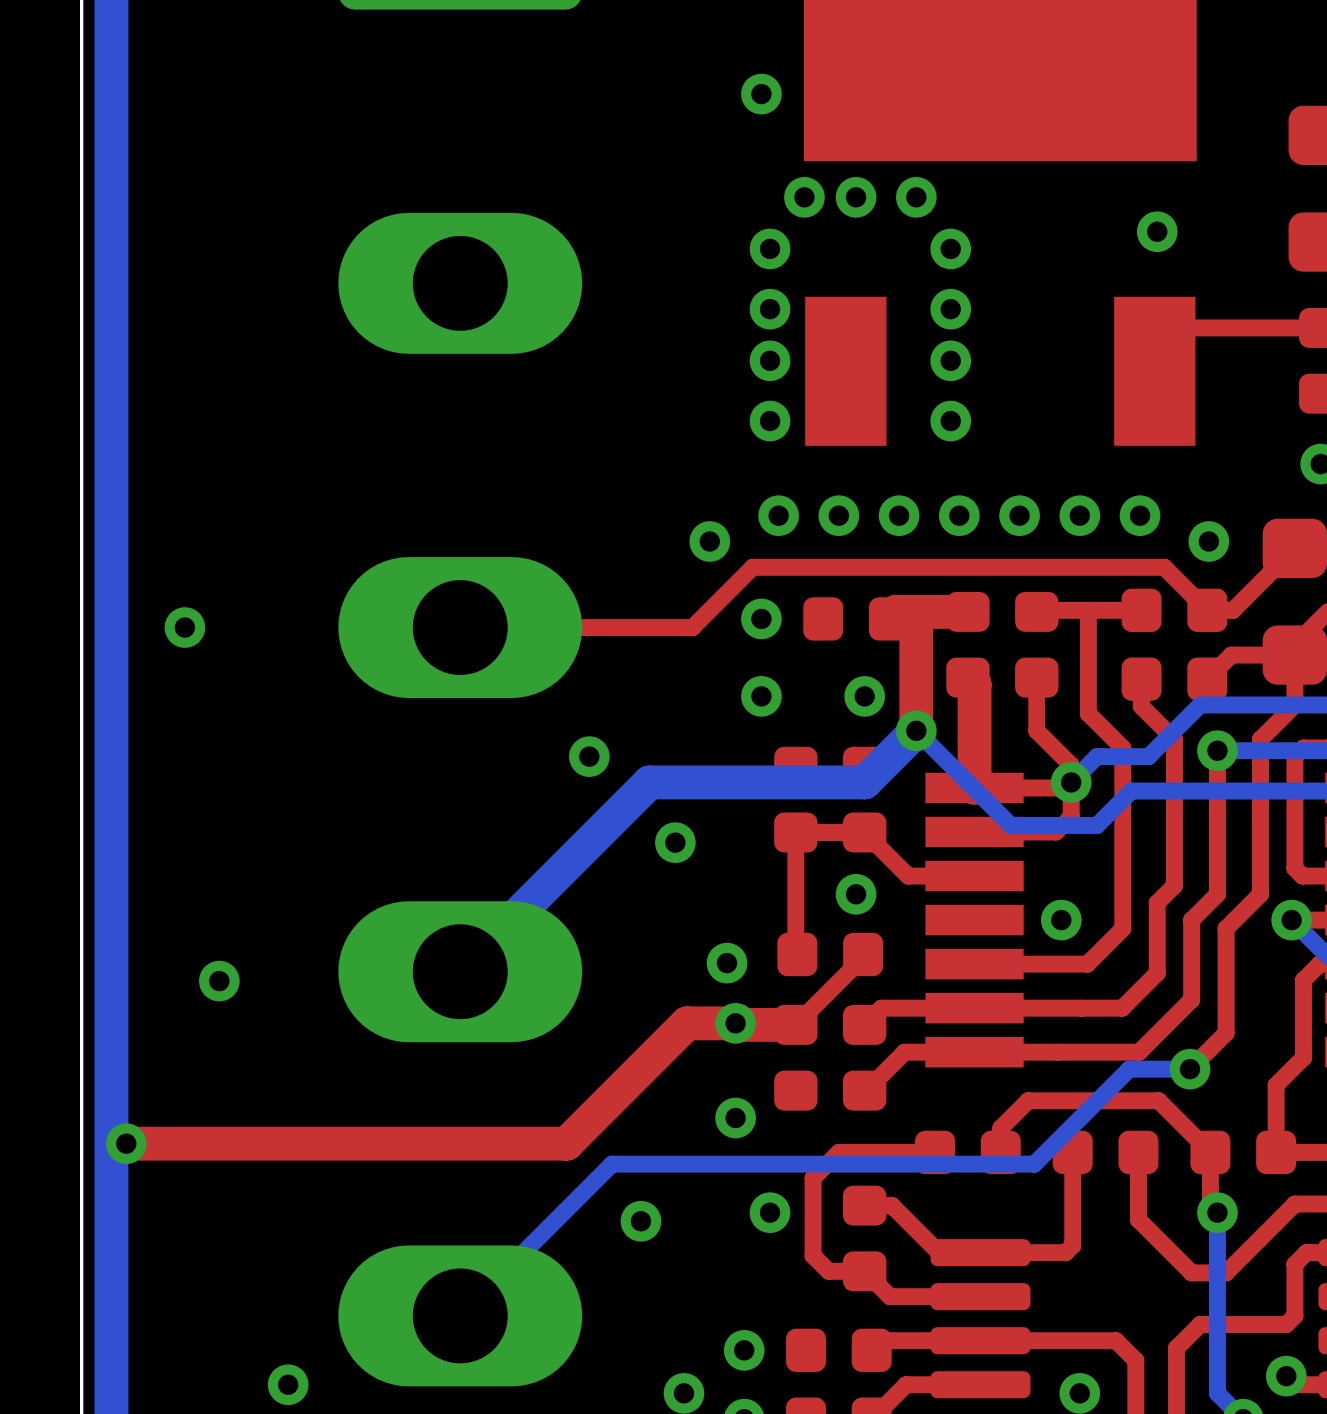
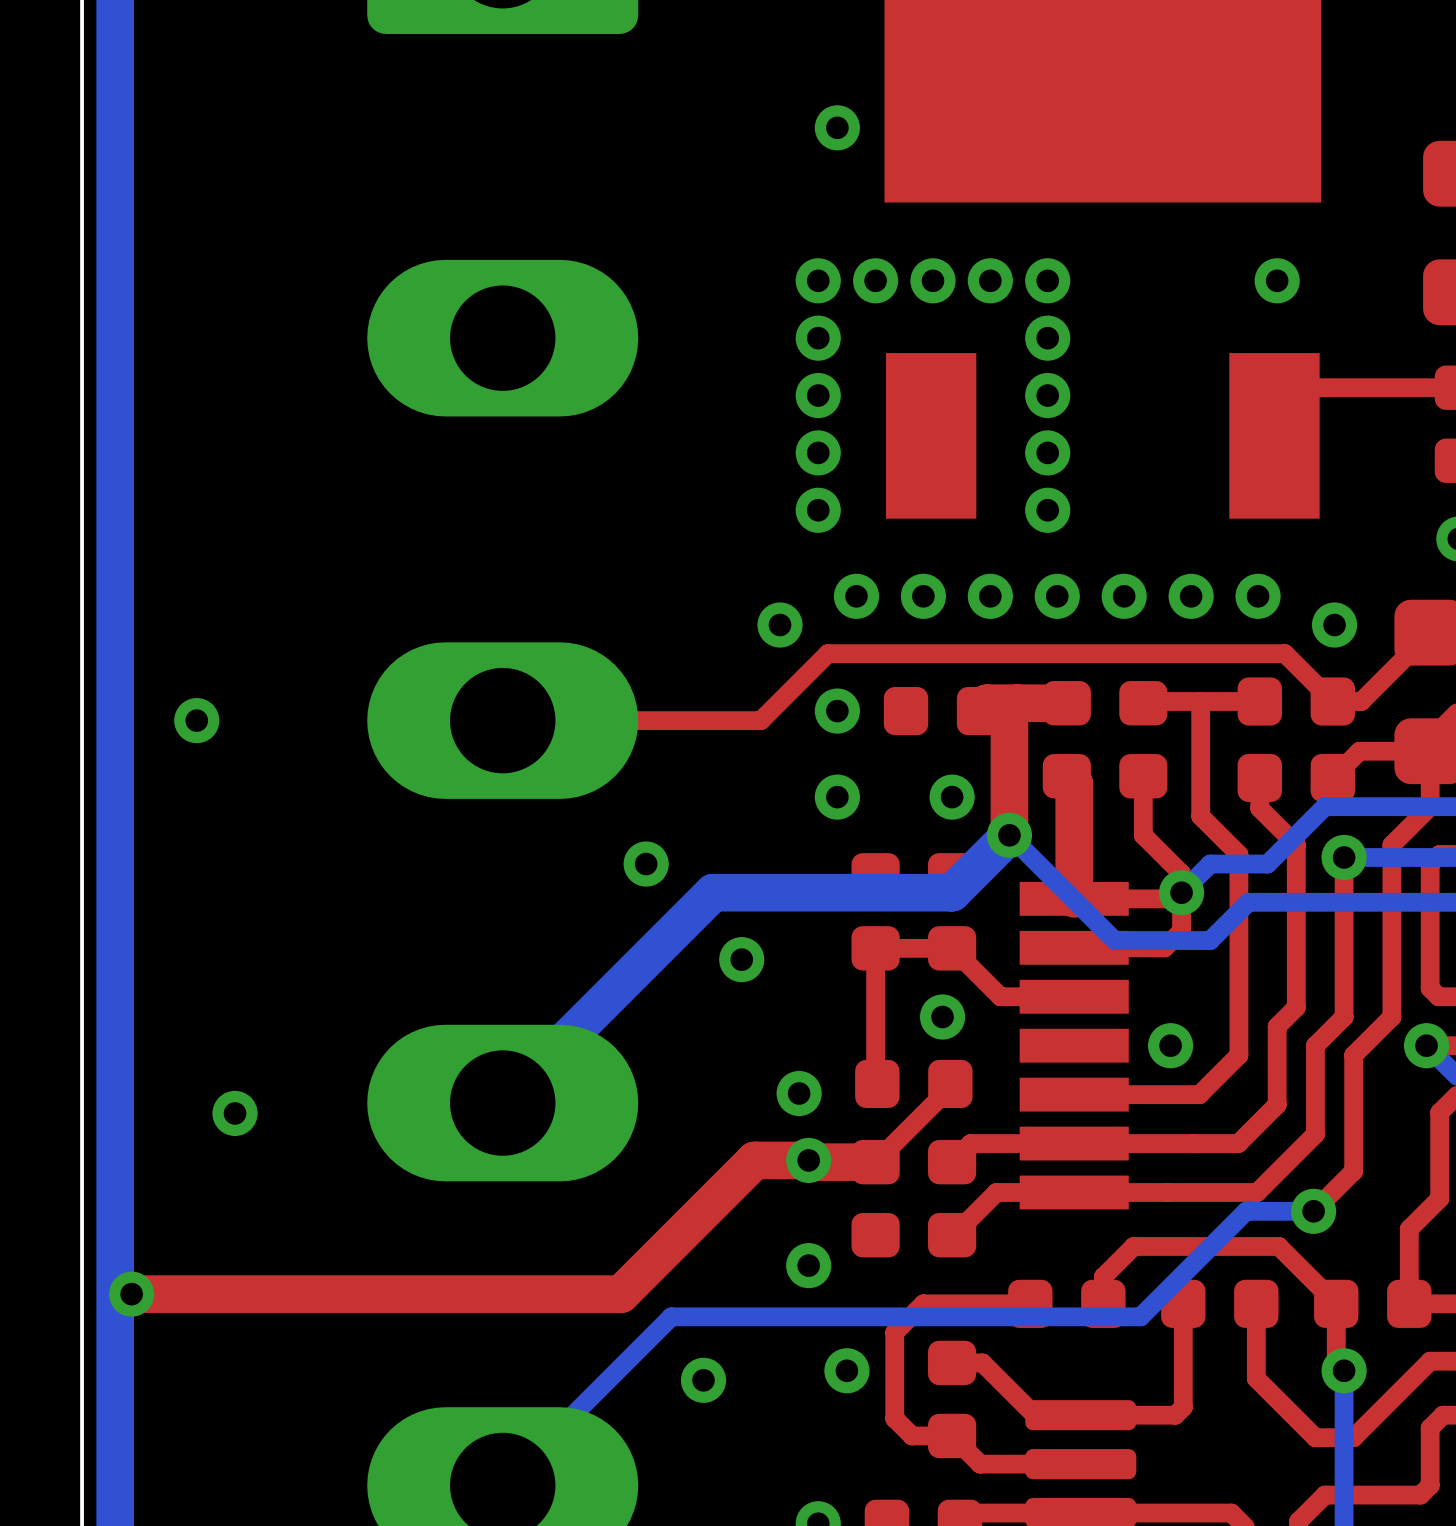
via: (804, 197) -> none
via position: (856, 197) -> (932, 280)
via: (916, 197) -> none
via: none -> (818, 280)
via: none -> (875, 280)
via: none -> (990, 280)
via: none -> (1047, 280)
via: (770, 248) -> none
via: (950, 248) -> none
via: none -> (818, 338)
via: none -> (1047, 338)
via: (770, 309) -> none
via: (950, 309) -> none
via: none -> (818, 395)
via: none -> (1047, 395)
via: (770, 360) -> none
via: (950, 360) -> none
via: none -> (818, 452)
via: none -> (1047, 452)
via: (770, 421) -> none
via: (950, 421) -> none
via: none -> (818, 510)
via: none -> (1047, 510)

